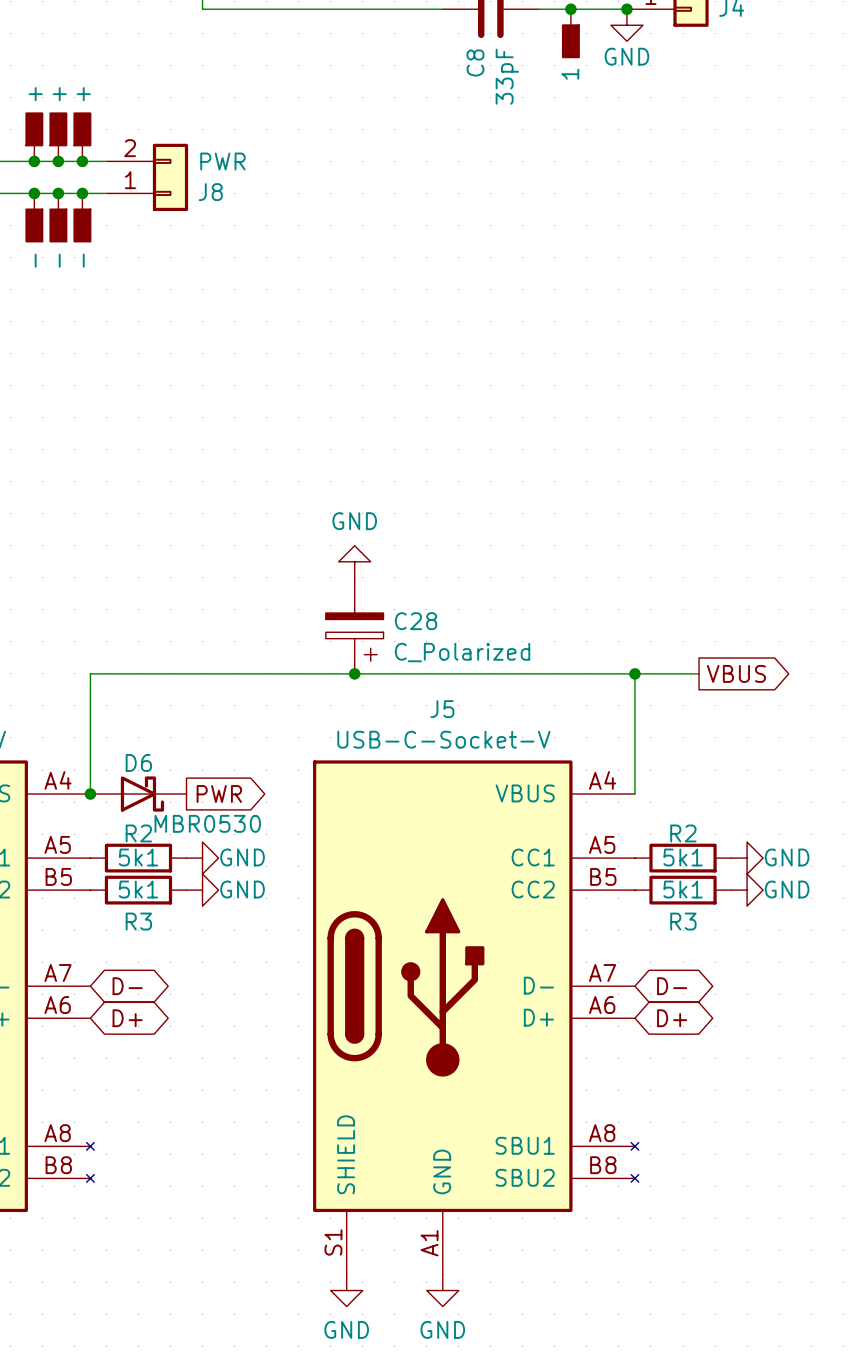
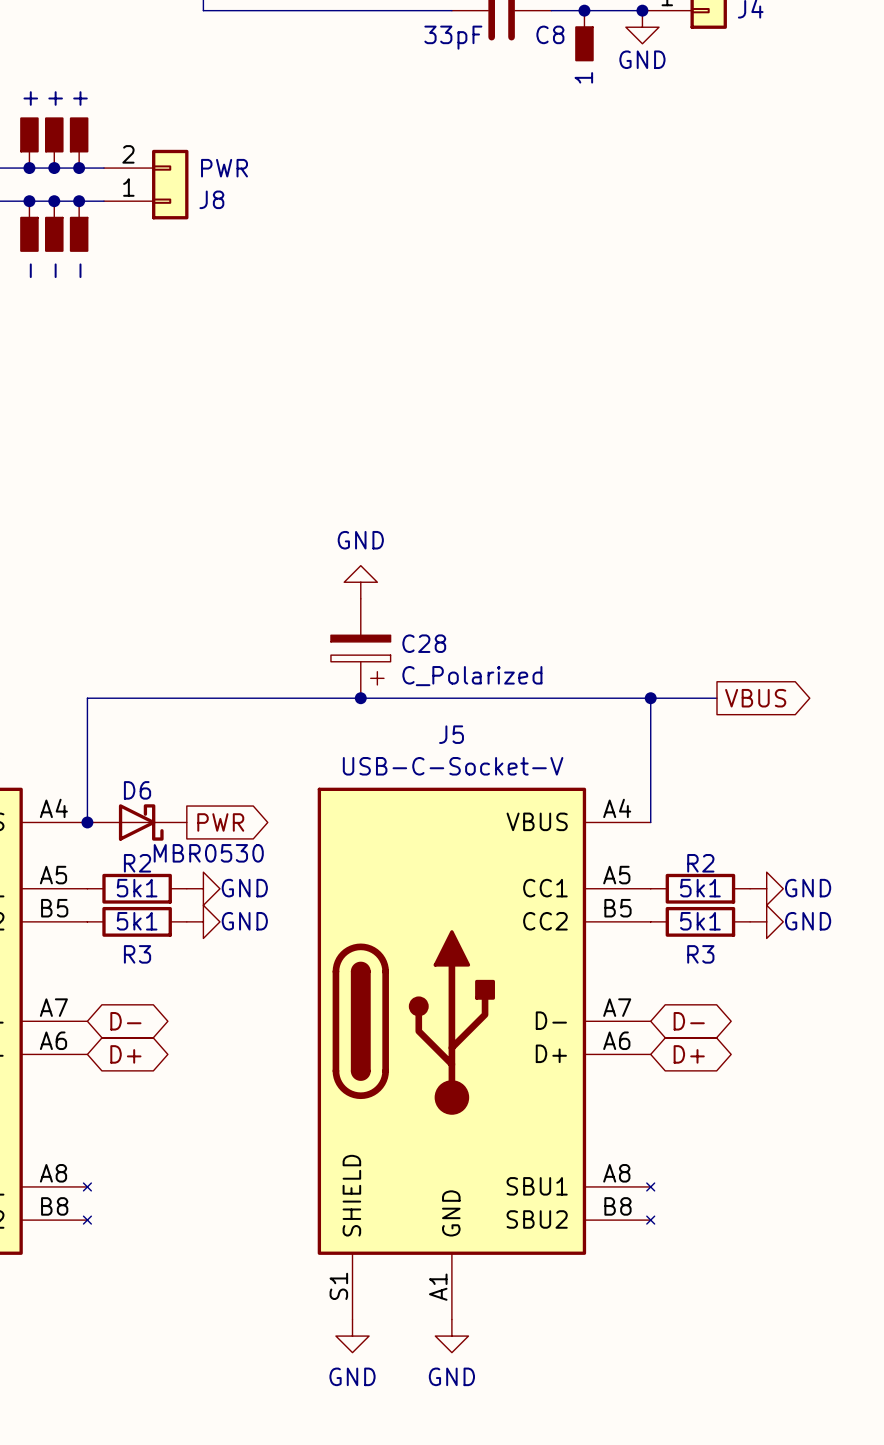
C8 name rotation: 0° (475, 62) -> 90° clockwise (550, 34)
C8 name position: C8 (475, 62) -> C8 (550, 34)
C8 value rotation: 0° (507, 76) -> 90° clockwise (453, 37)
C8 value position: 33pF (507, 76) -> 33pF (453, 37)

